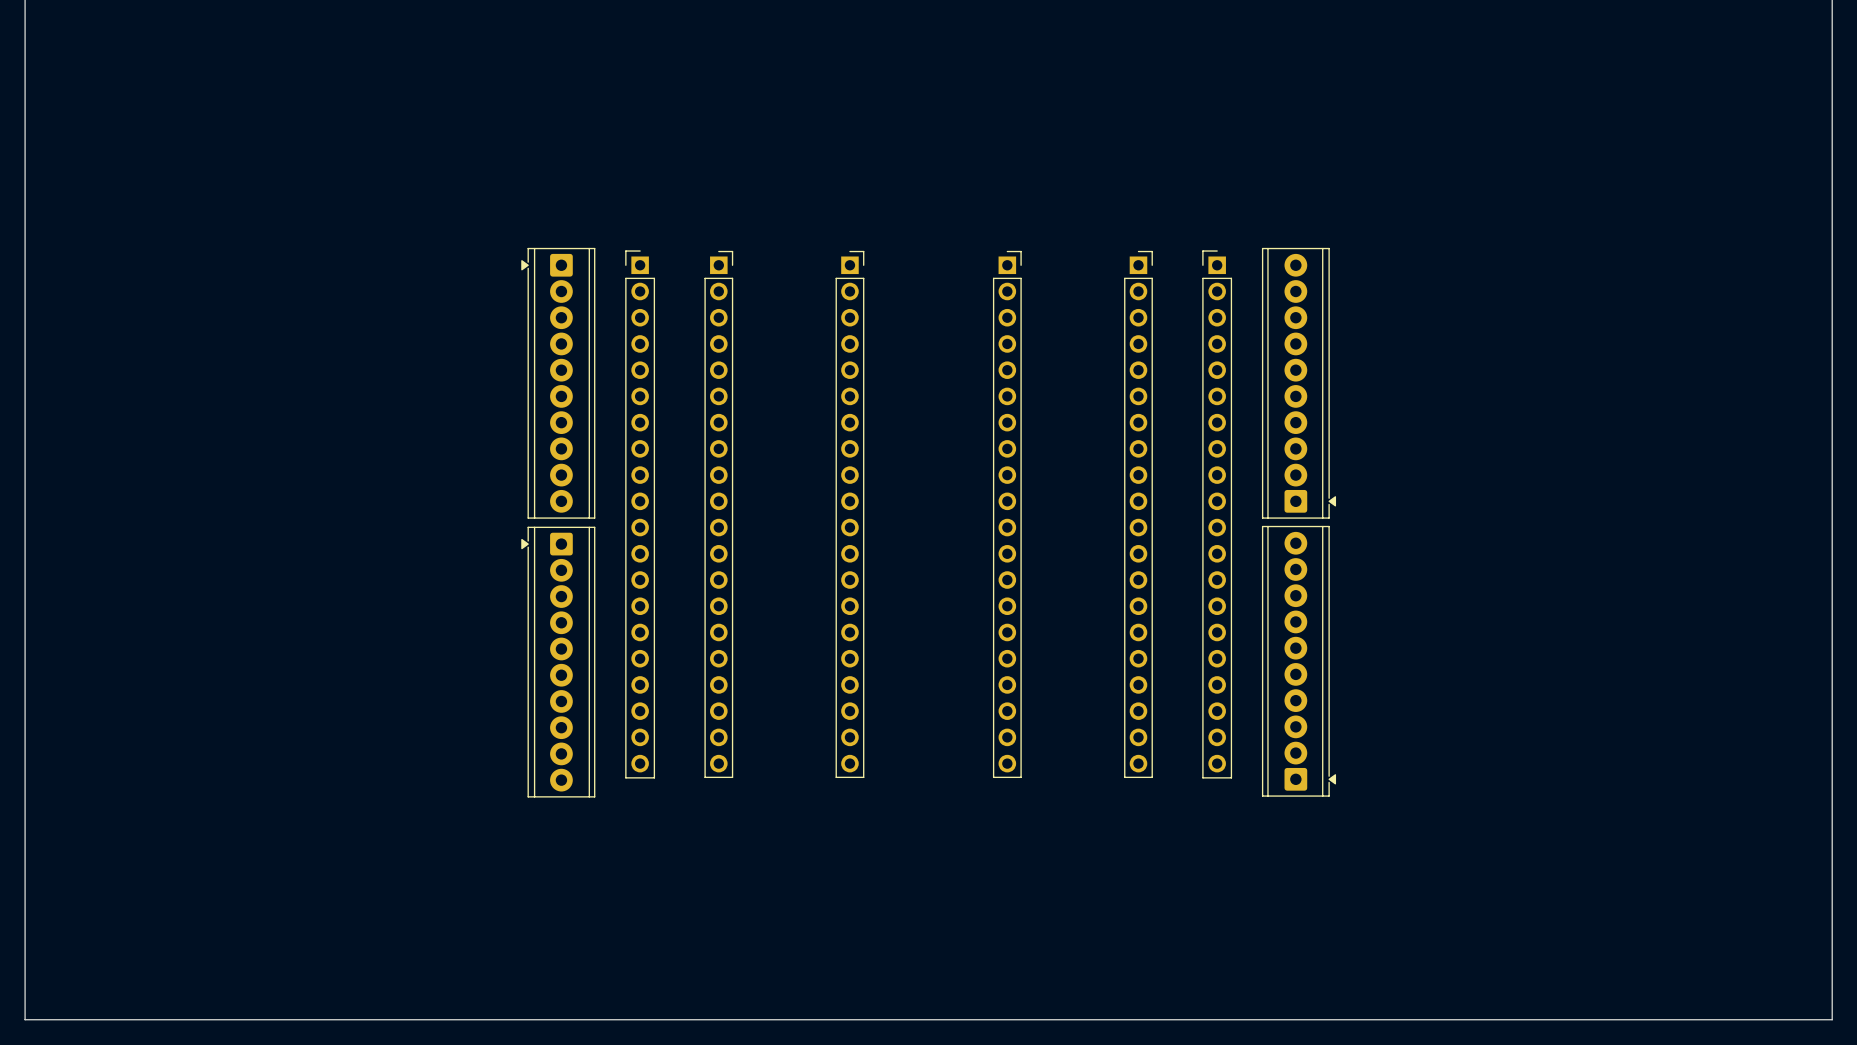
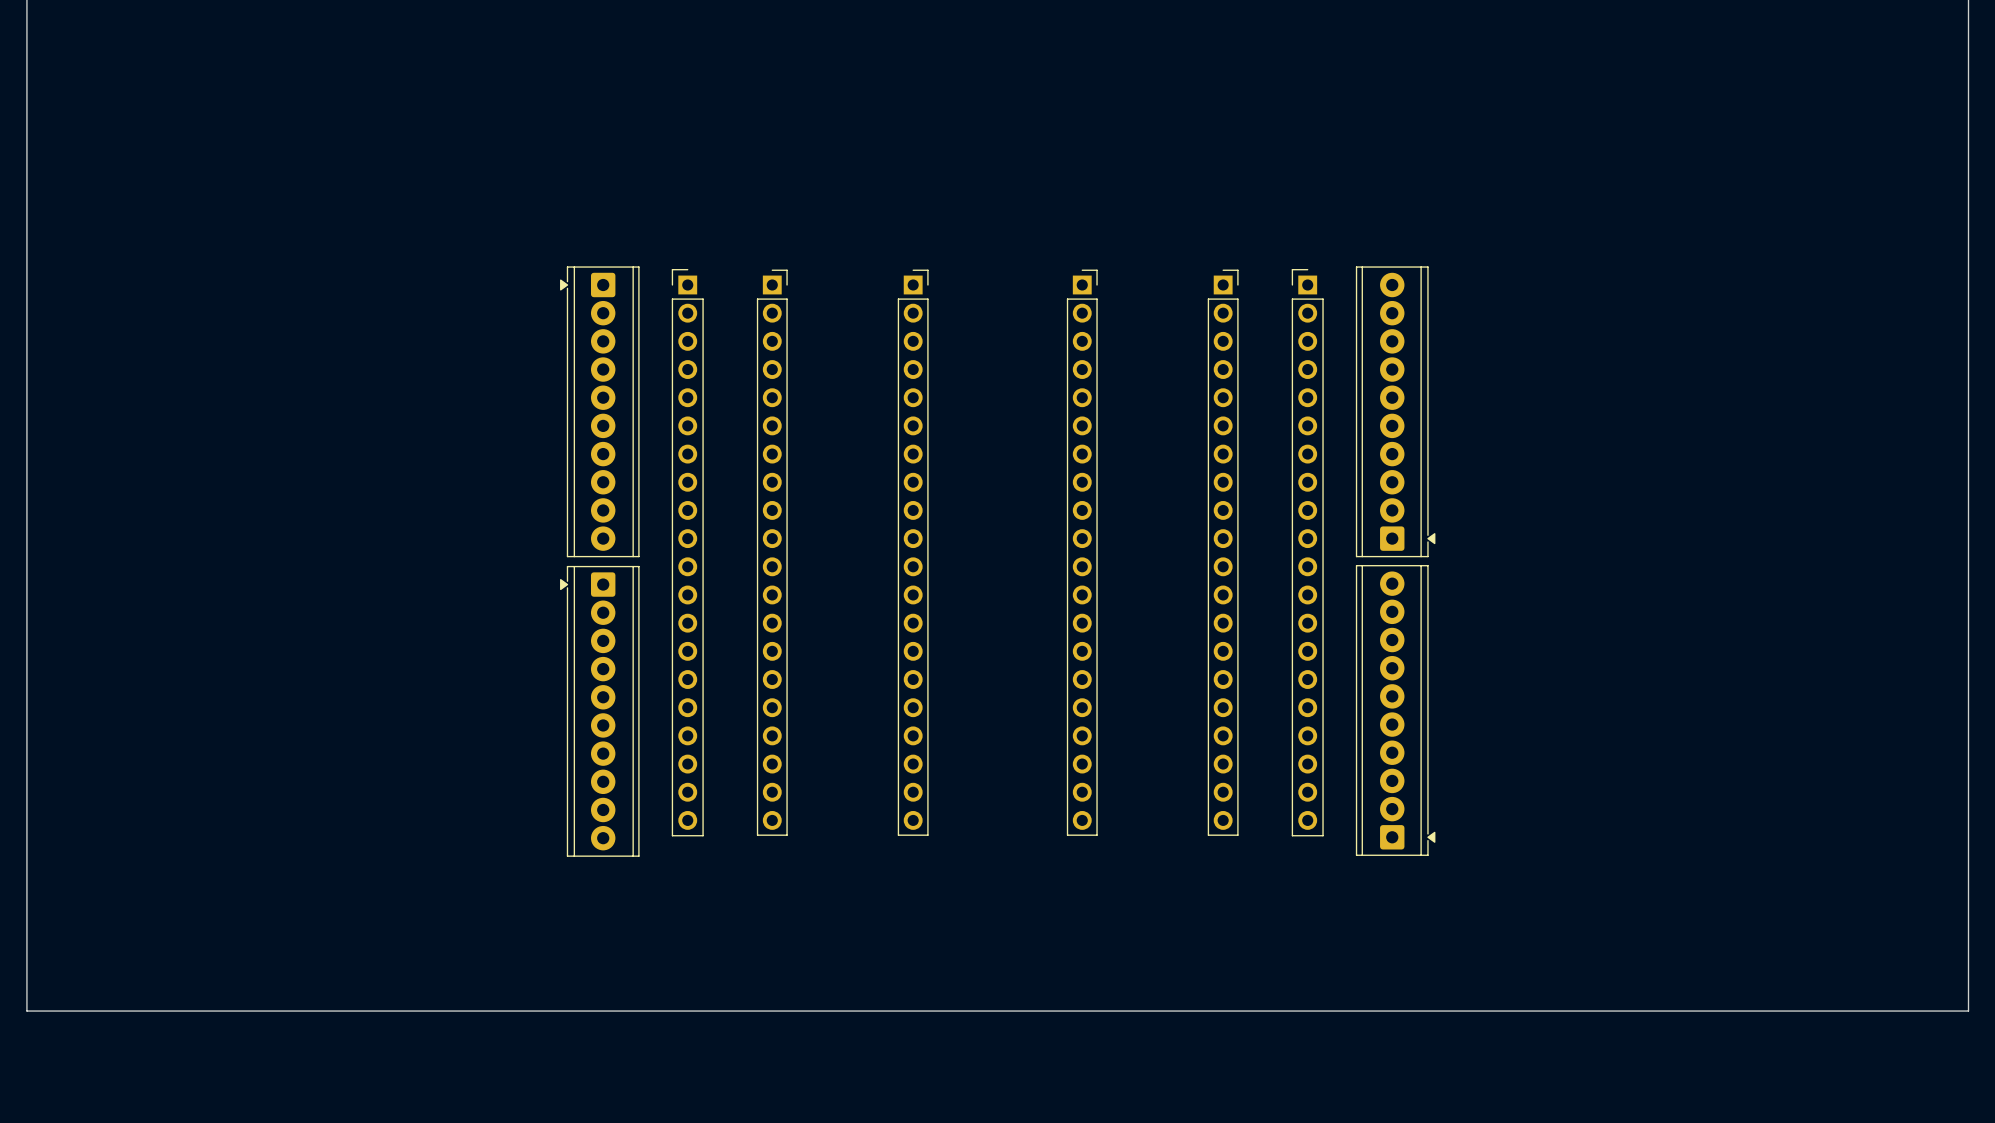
board edge: (25, 941) (25, 1019) (1832, 1019) (1832, 941) -> (26, 1011) (1968, 1011)

